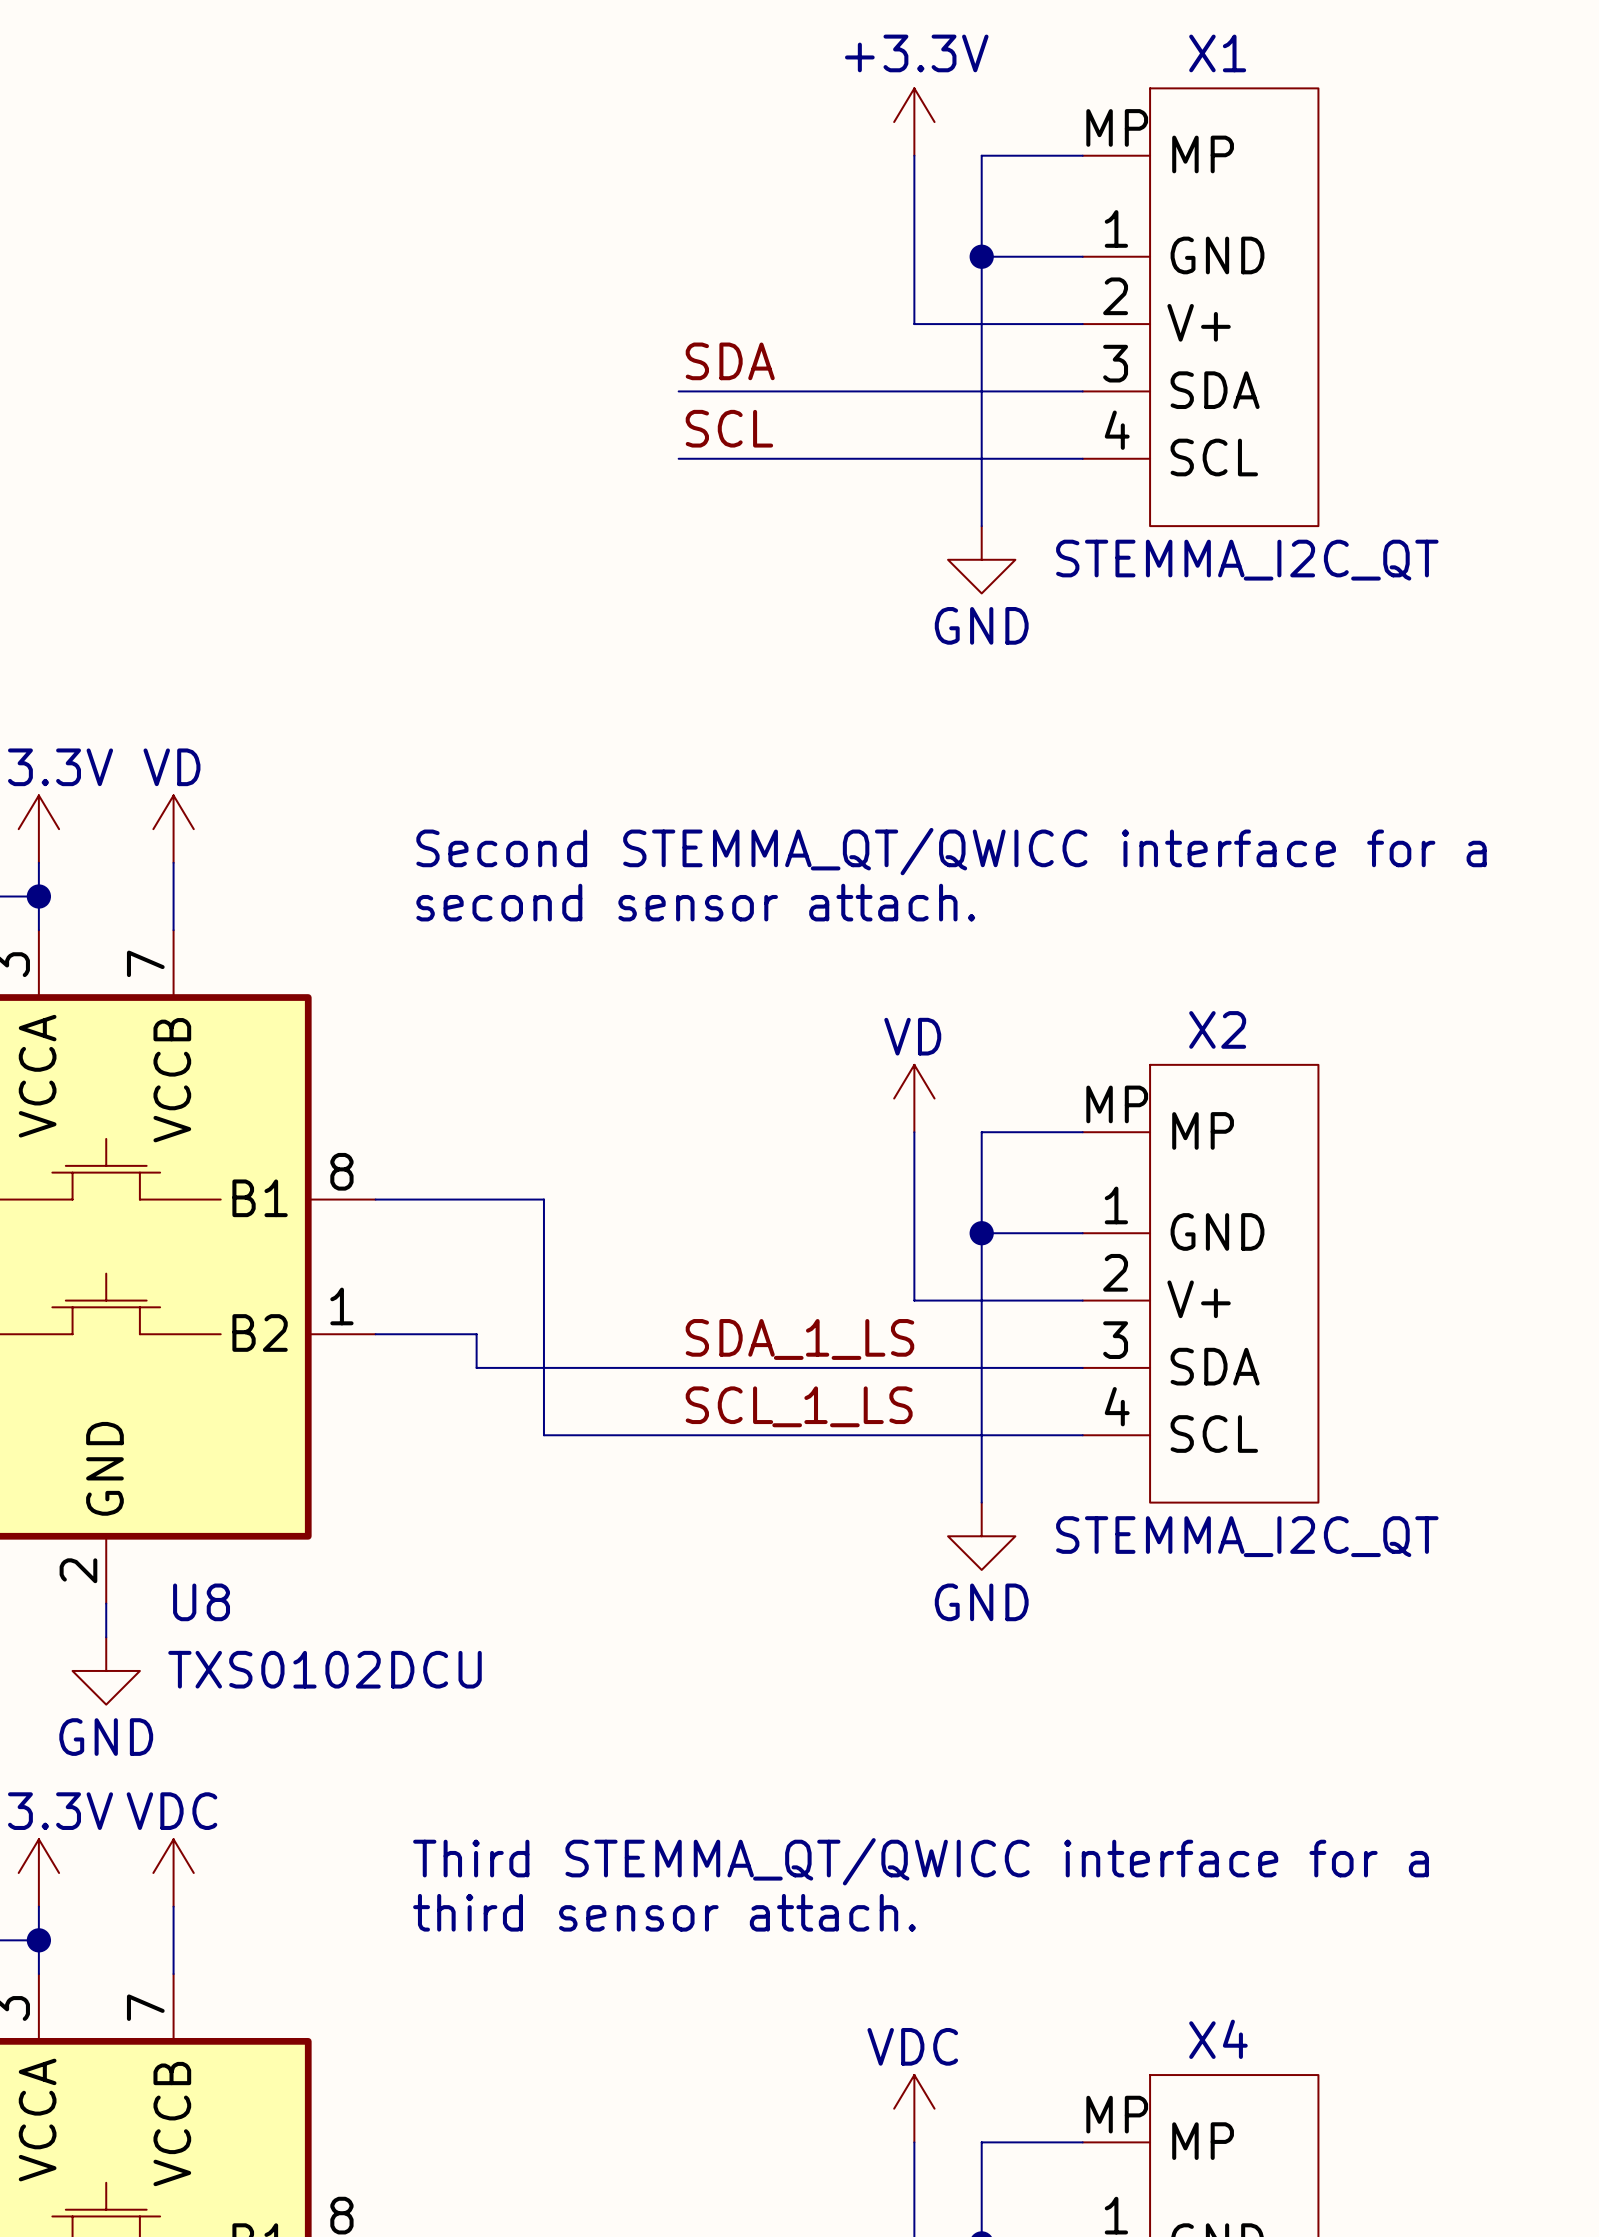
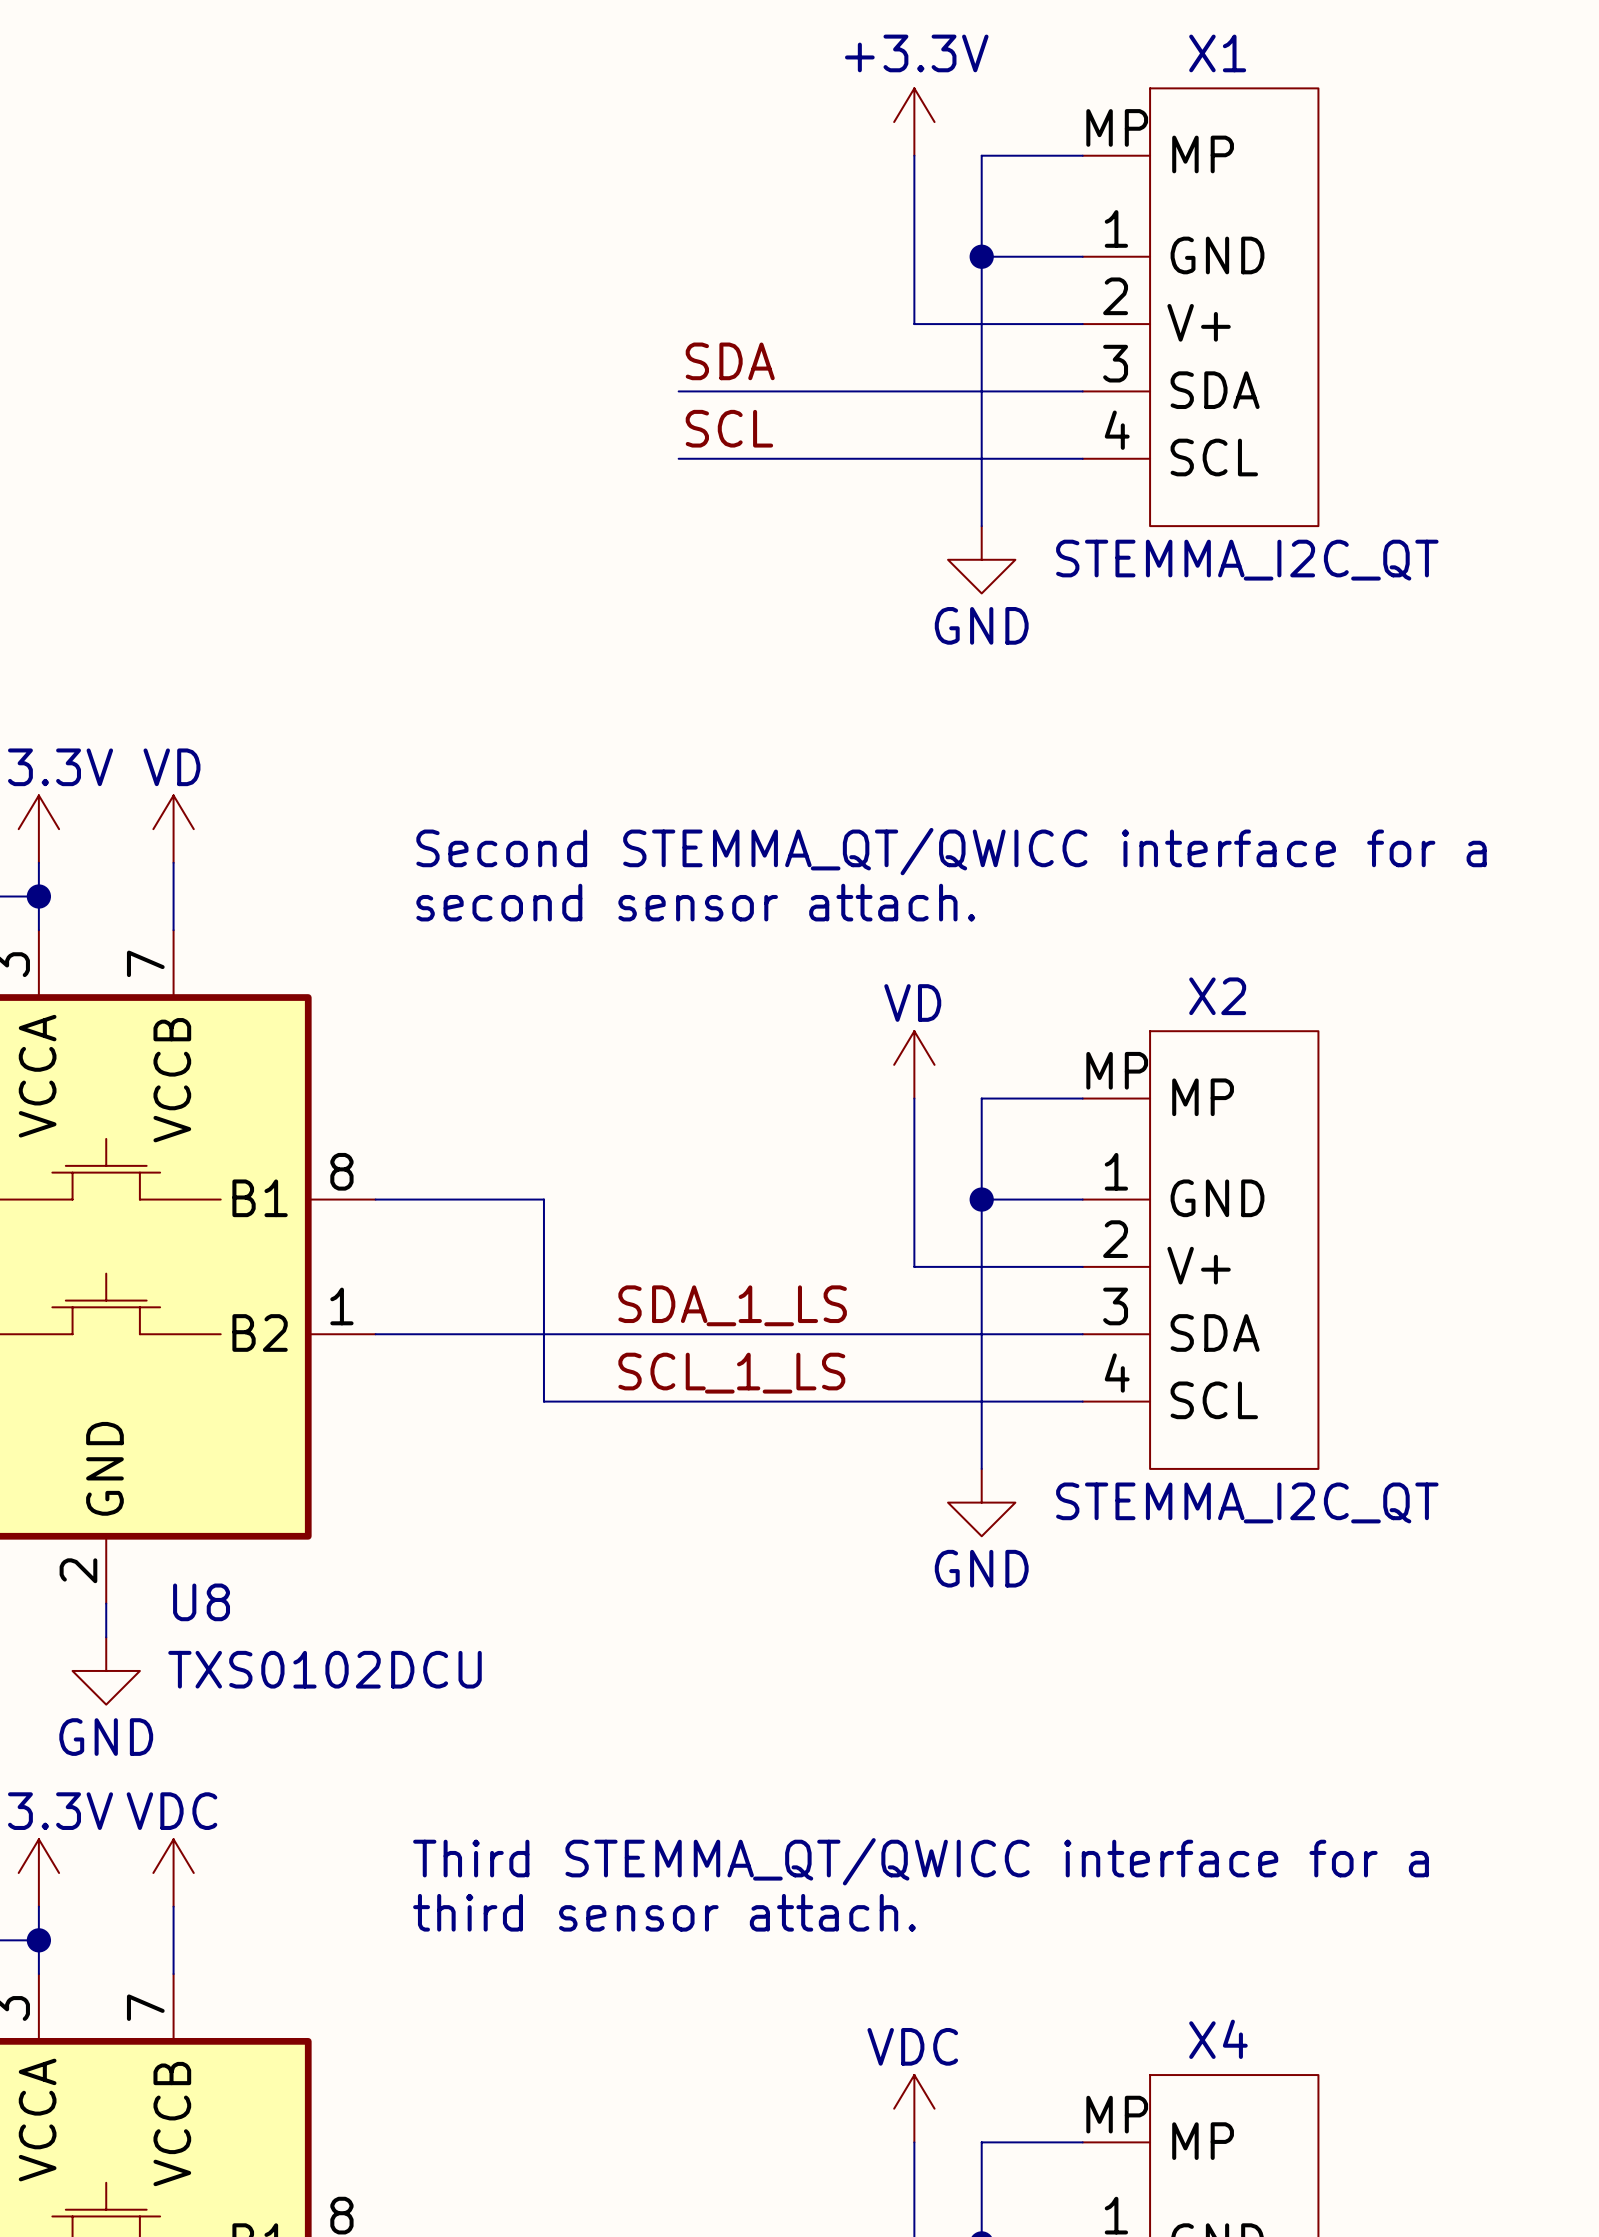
power symbol position: VD (914, 1098) -> VD (914, 1064)
wire: (981, 1132) (1082, 1132) -> (981, 1132) (981, 1098) (1082, 1098)
wire: (981, 1233) (1082, 1233) -> (981, 1199) (1082, 1199)
junction position: (981, 1233) -> (981, 1199)
wire: (914, 1266) (914, 1300) (1082, 1300) -> (914, 1266) (1082, 1266)
X2 position: (1200, 1283) -> (1200, 1250)
wire: (476, 1334) (476, 1367) (1082, 1367) -> (476, 1334) (1082, 1334)
label position: SDA_1_LS (799, 1339) -> SDA_1_LS (732, 1305)
wire: (543, 1401) (543, 1435) (1082, 1435) -> (543, 1401) (1082, 1401)
label position: SCL_1_LS (799, 1406) -> SCL_1_LS (731, 1373)
power symbol position: GND (981, 1536) -> GND (981, 1502)

